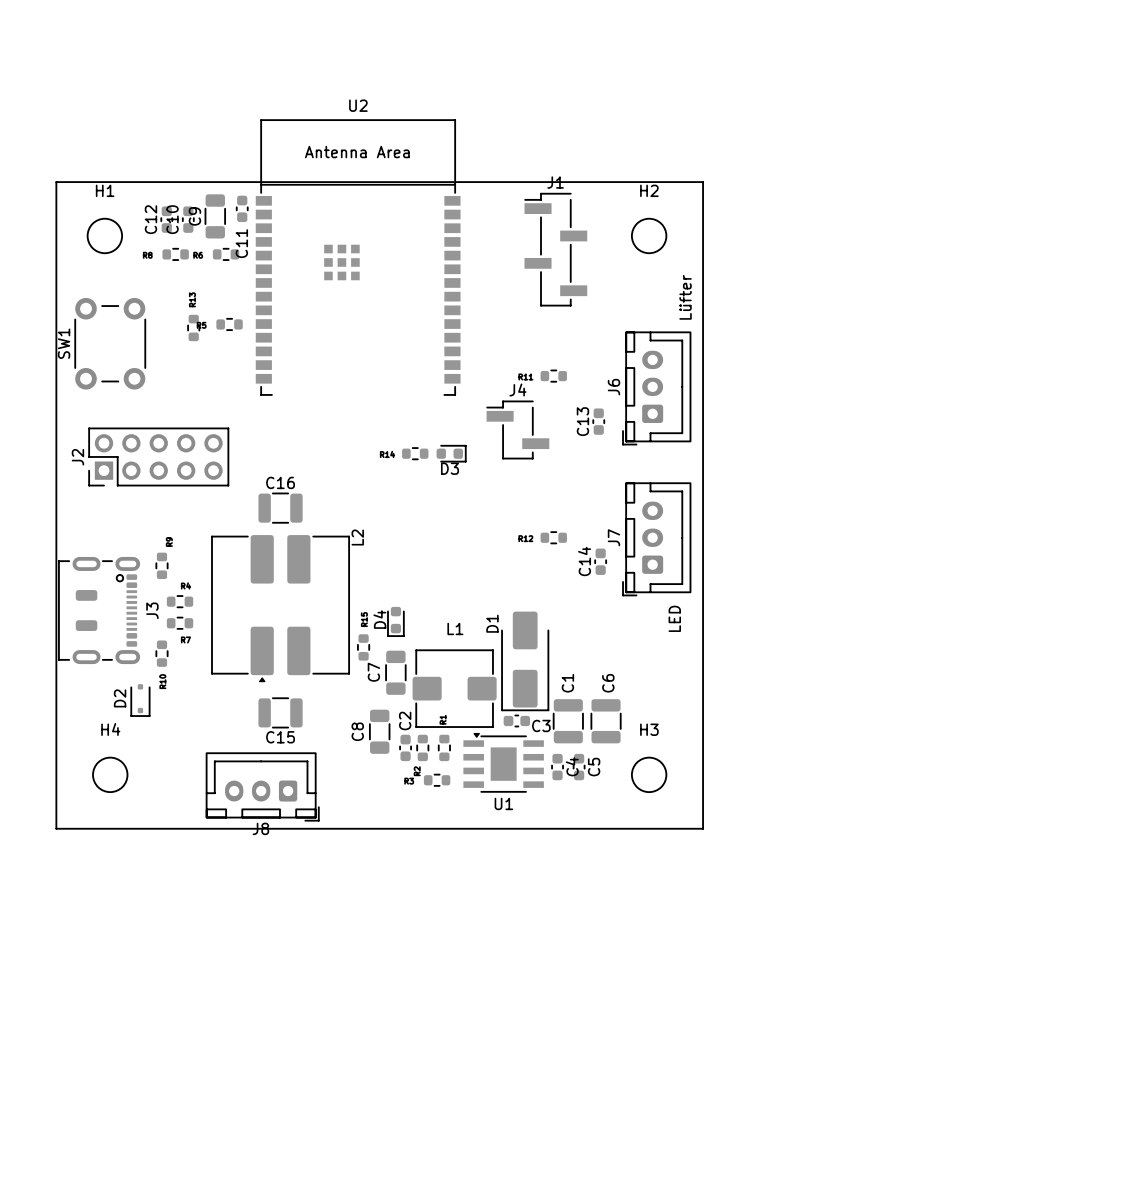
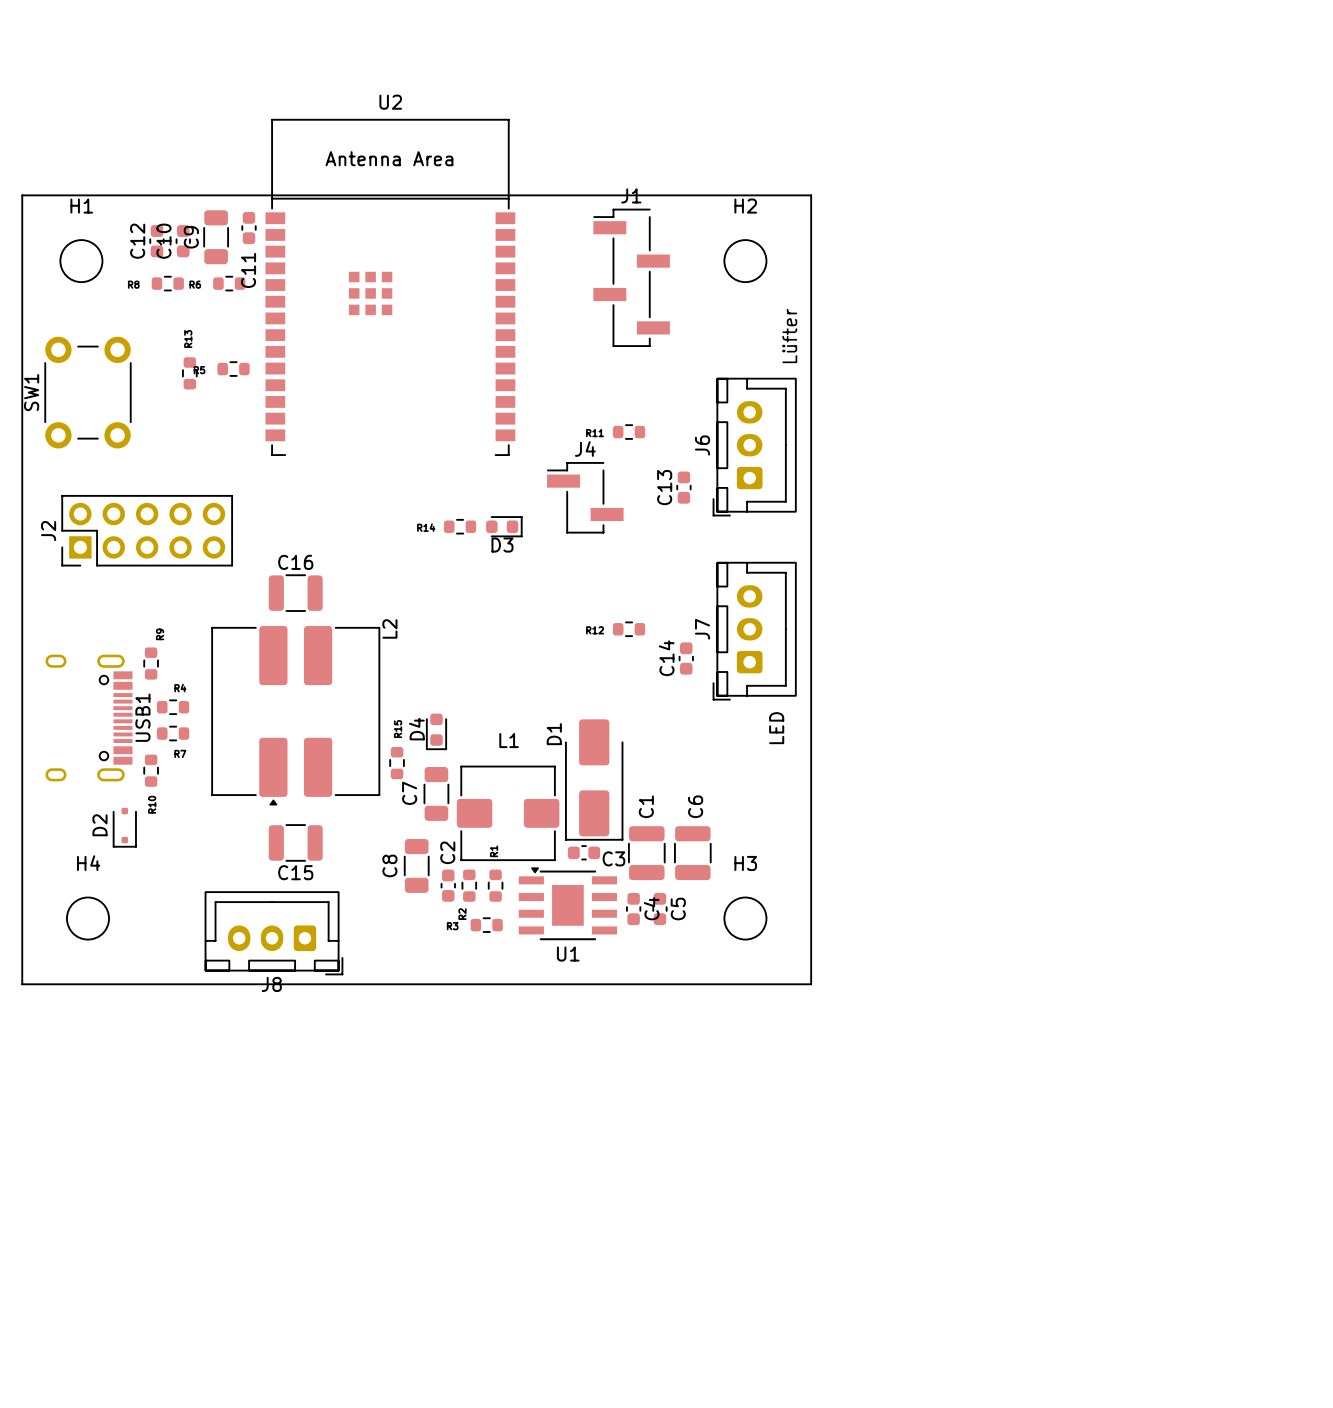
J3: (99, 610) -> none
USB1: none -> (88, 718)

